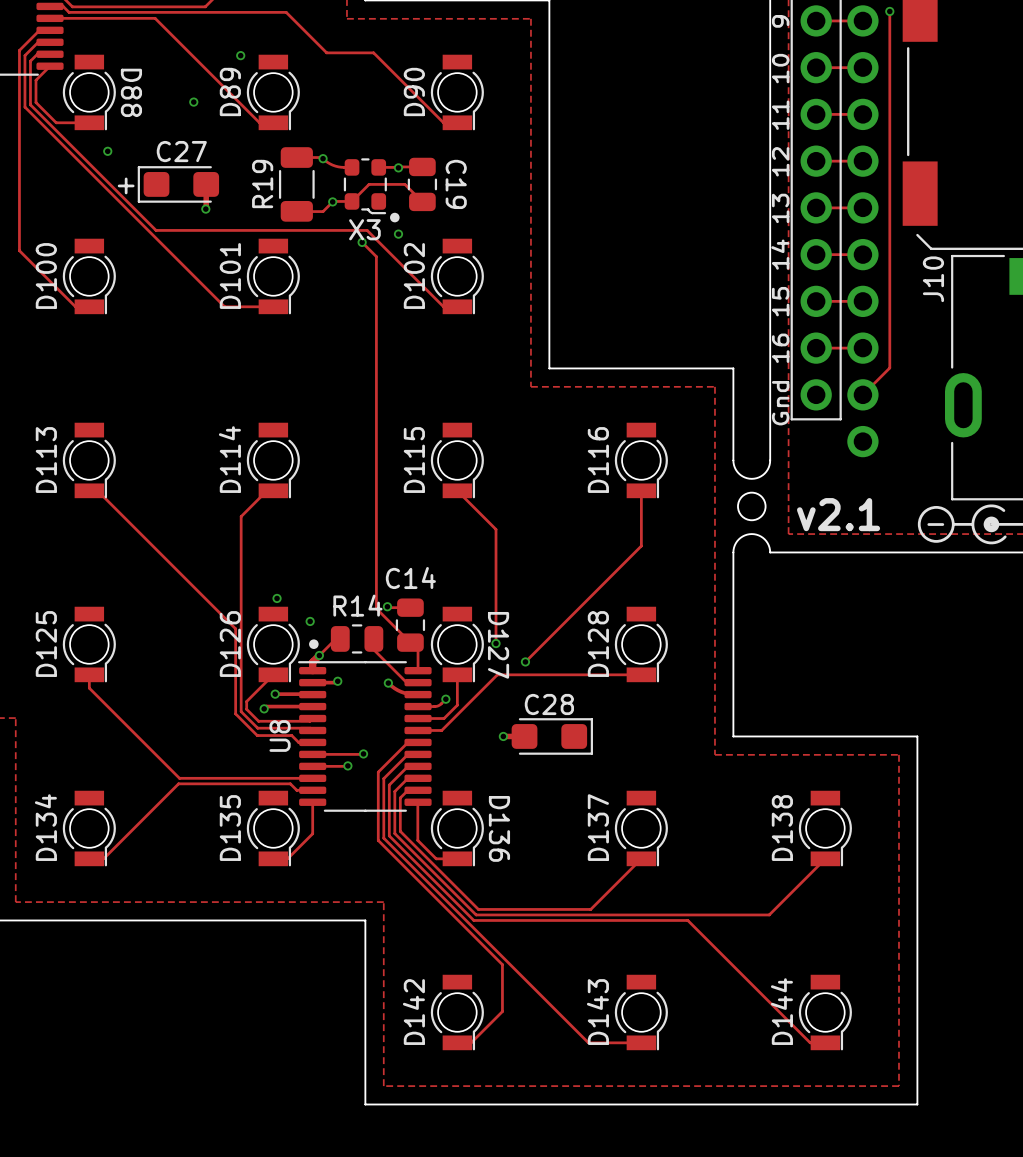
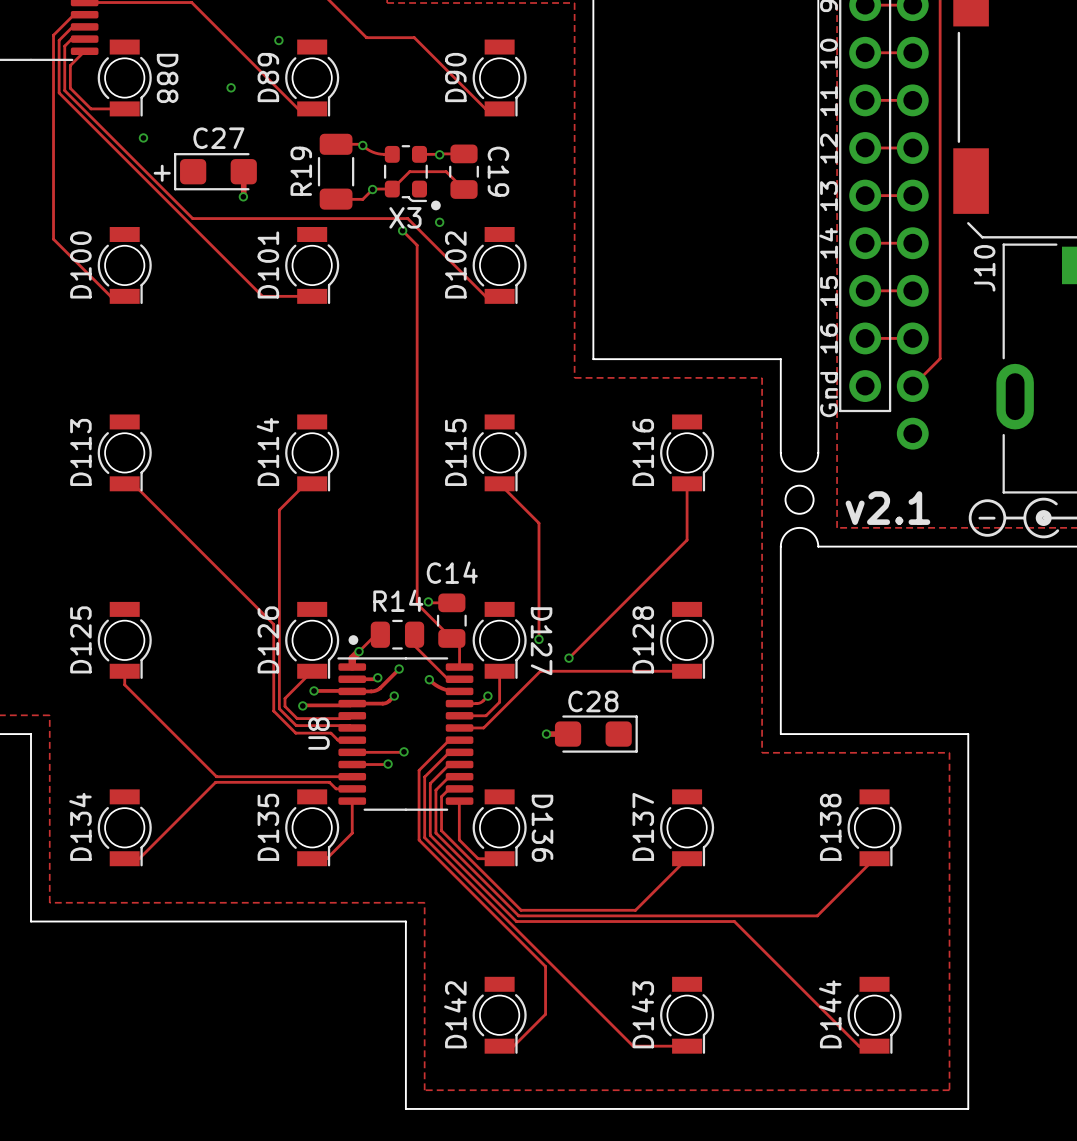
via: (277, 598) -> none
via: (310, 621) -> none
track: none -> (399, 669) (377, 690) (352, 691)
via: none -> (399, 669)
via: none -> (394, 696)
track: (312, 706) (266, 706) (264, 708) -> (394, 696) (383, 703) (303, 705)

